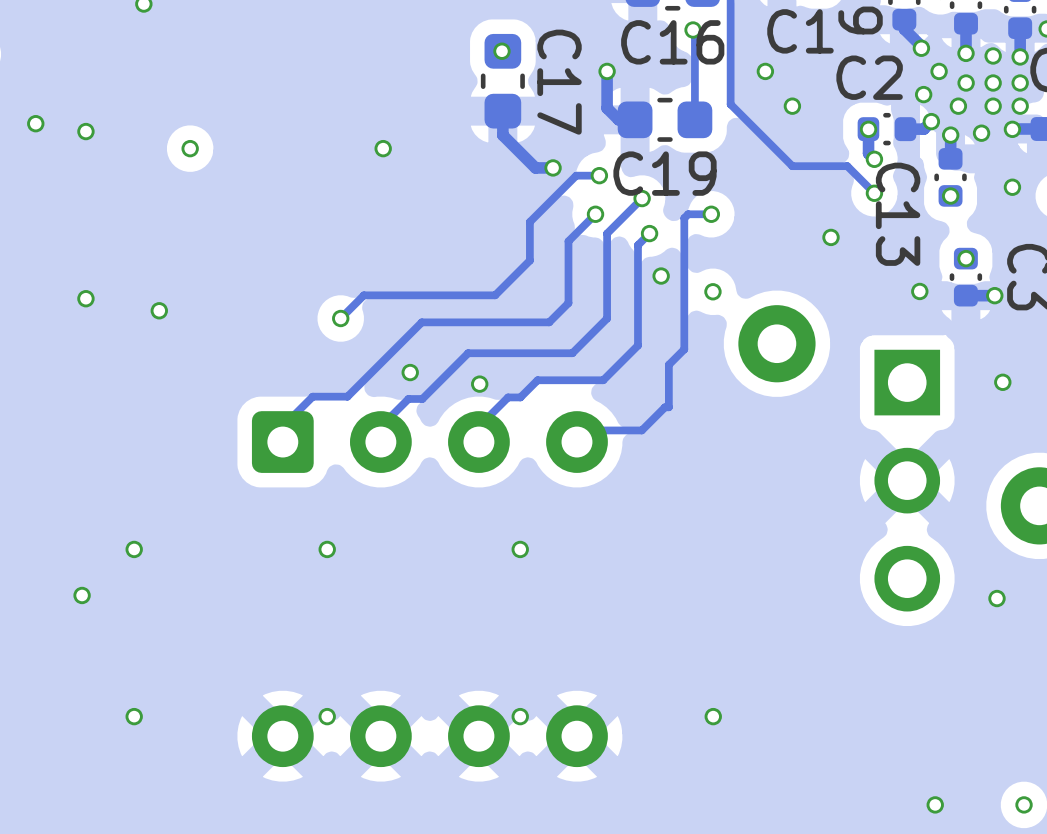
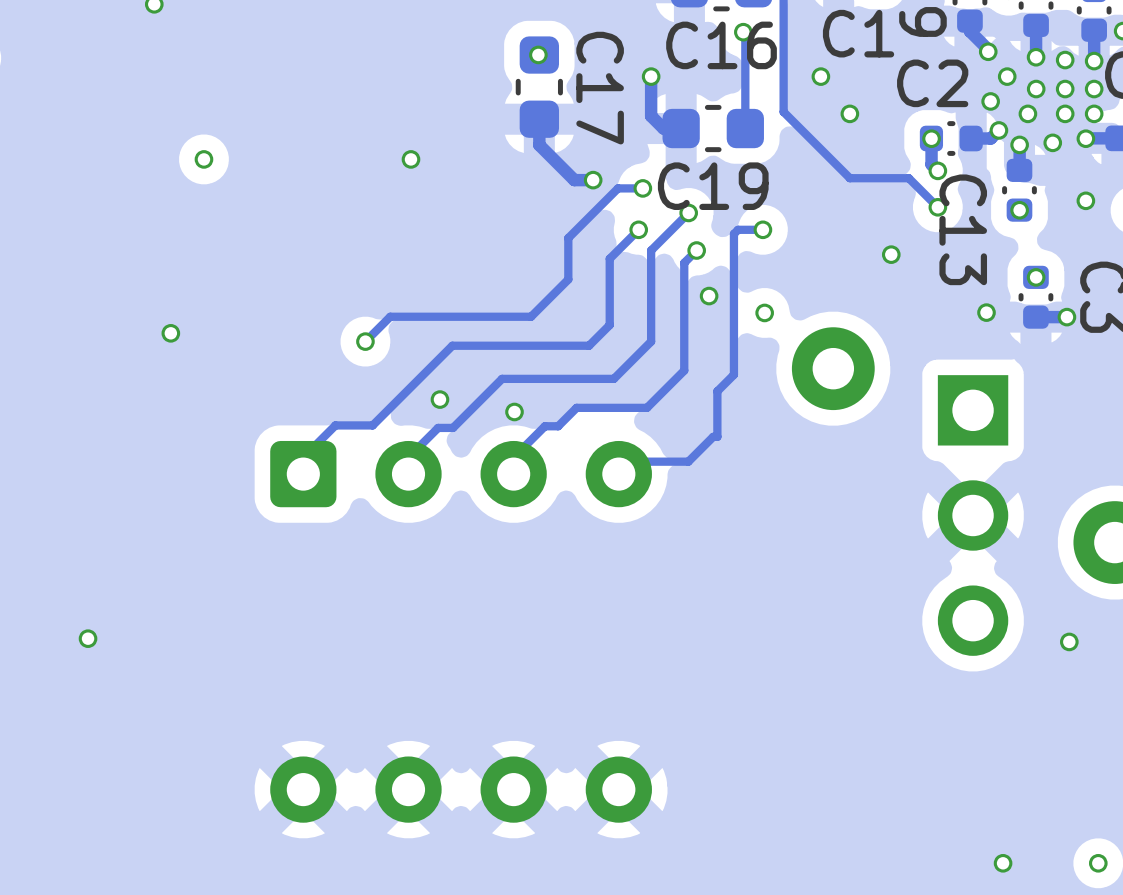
via: (35, 123) -> none
via: (85, 131) -> none
via: (85, 298) -> none
via: (1002, 382) -> none
via: (134, 549) -> none
via: (327, 549) -> none
via: (520, 549) -> none
via: (134, 716) -> none
via: (327, 716) -> none
via: (520, 716) -> none
via: (713, 716) -> none

